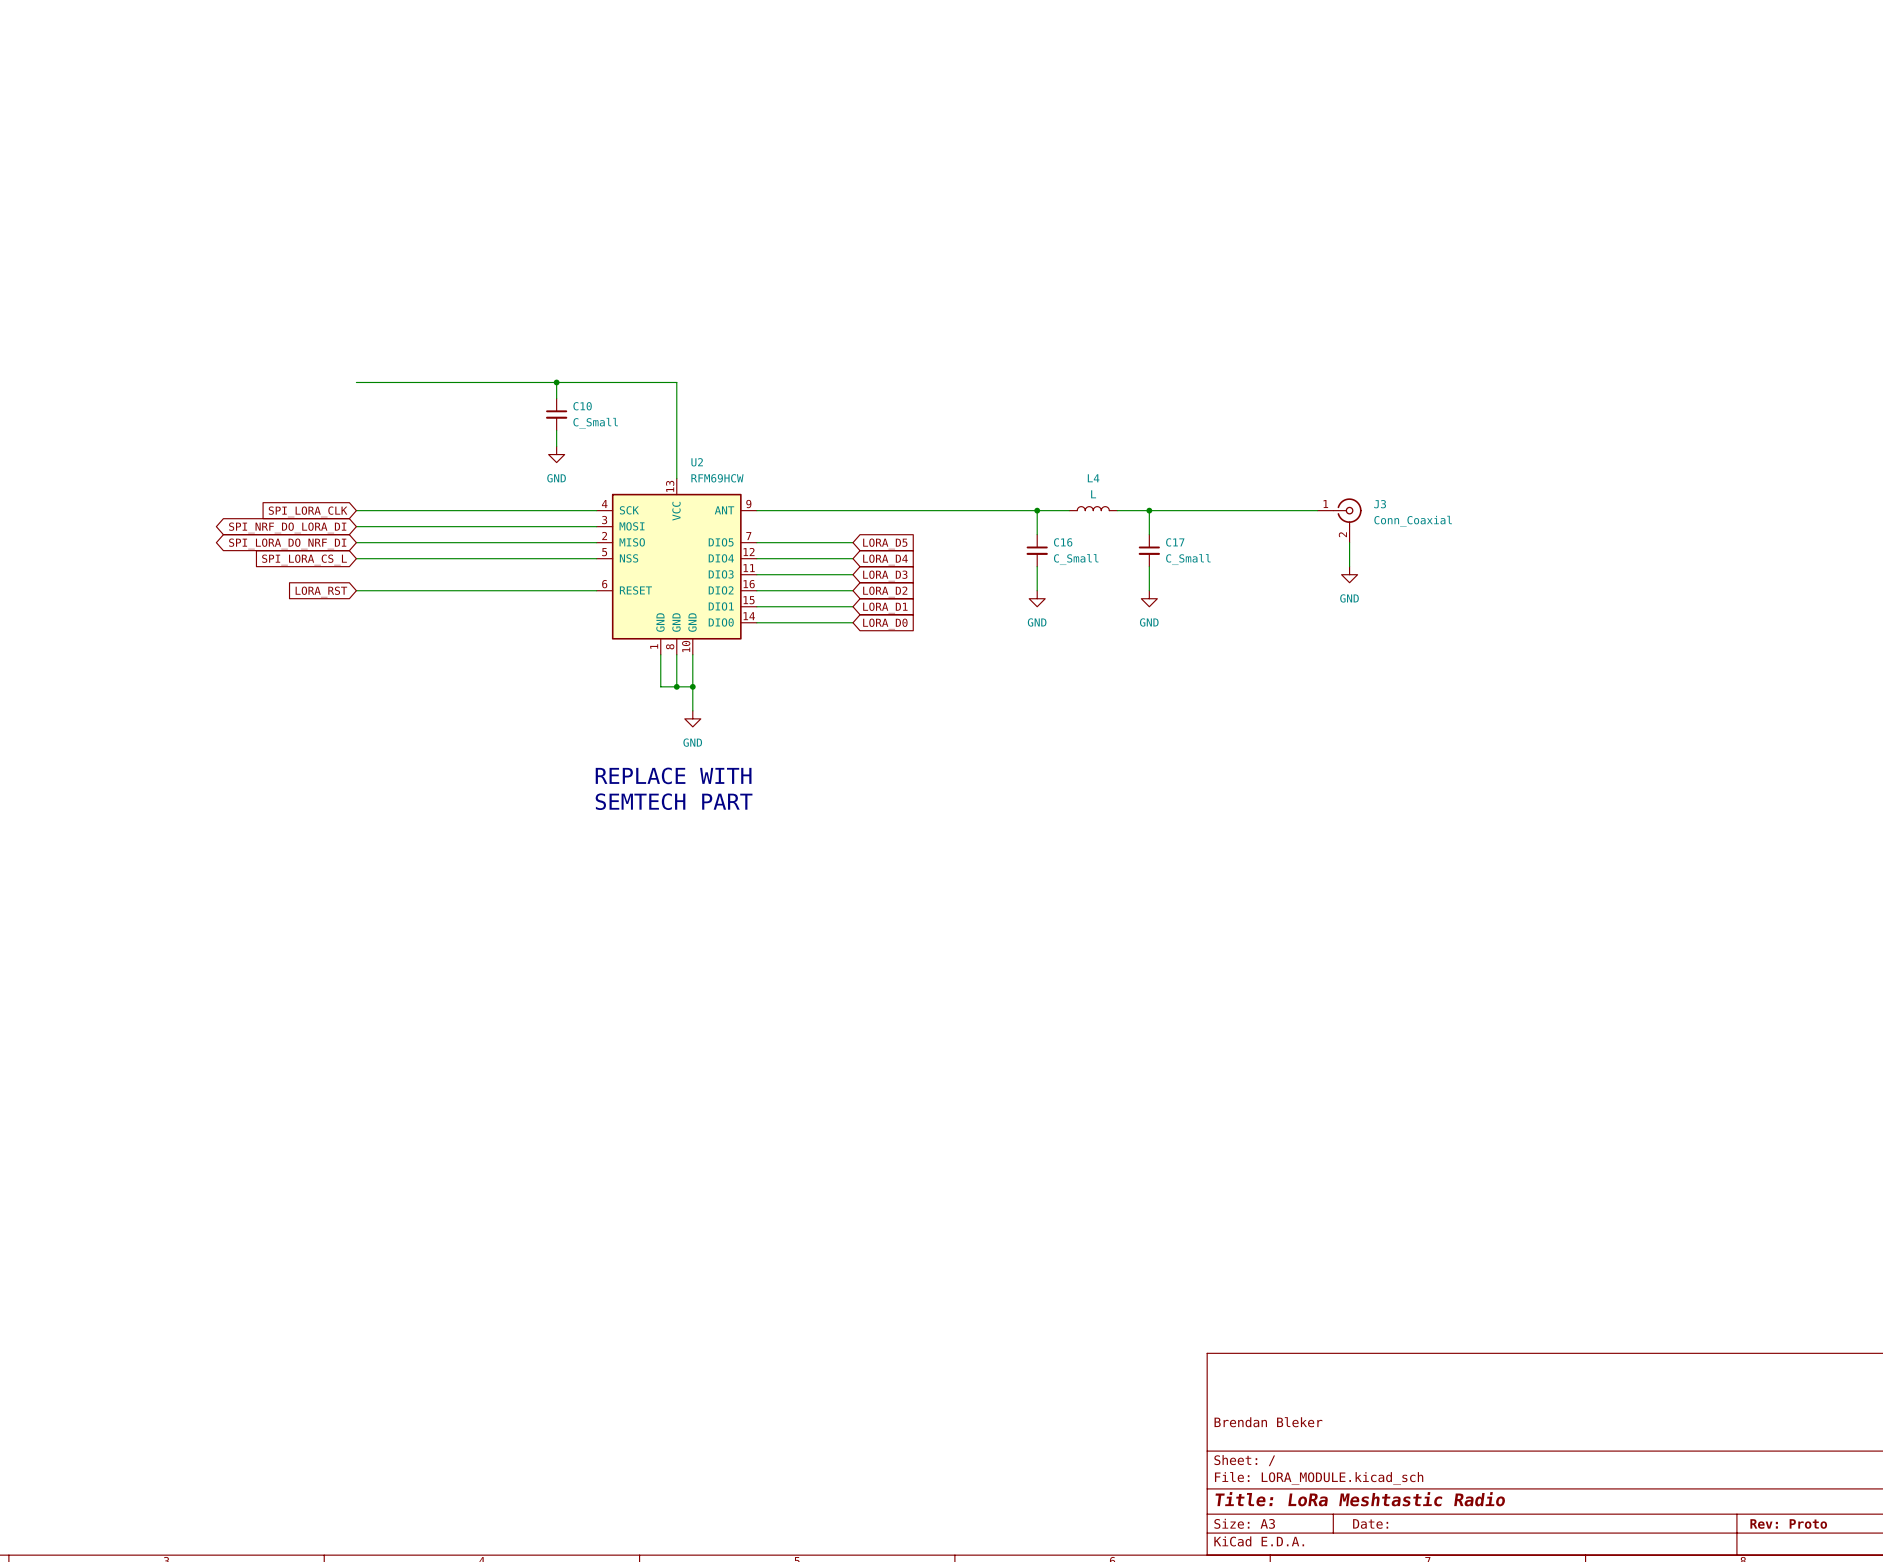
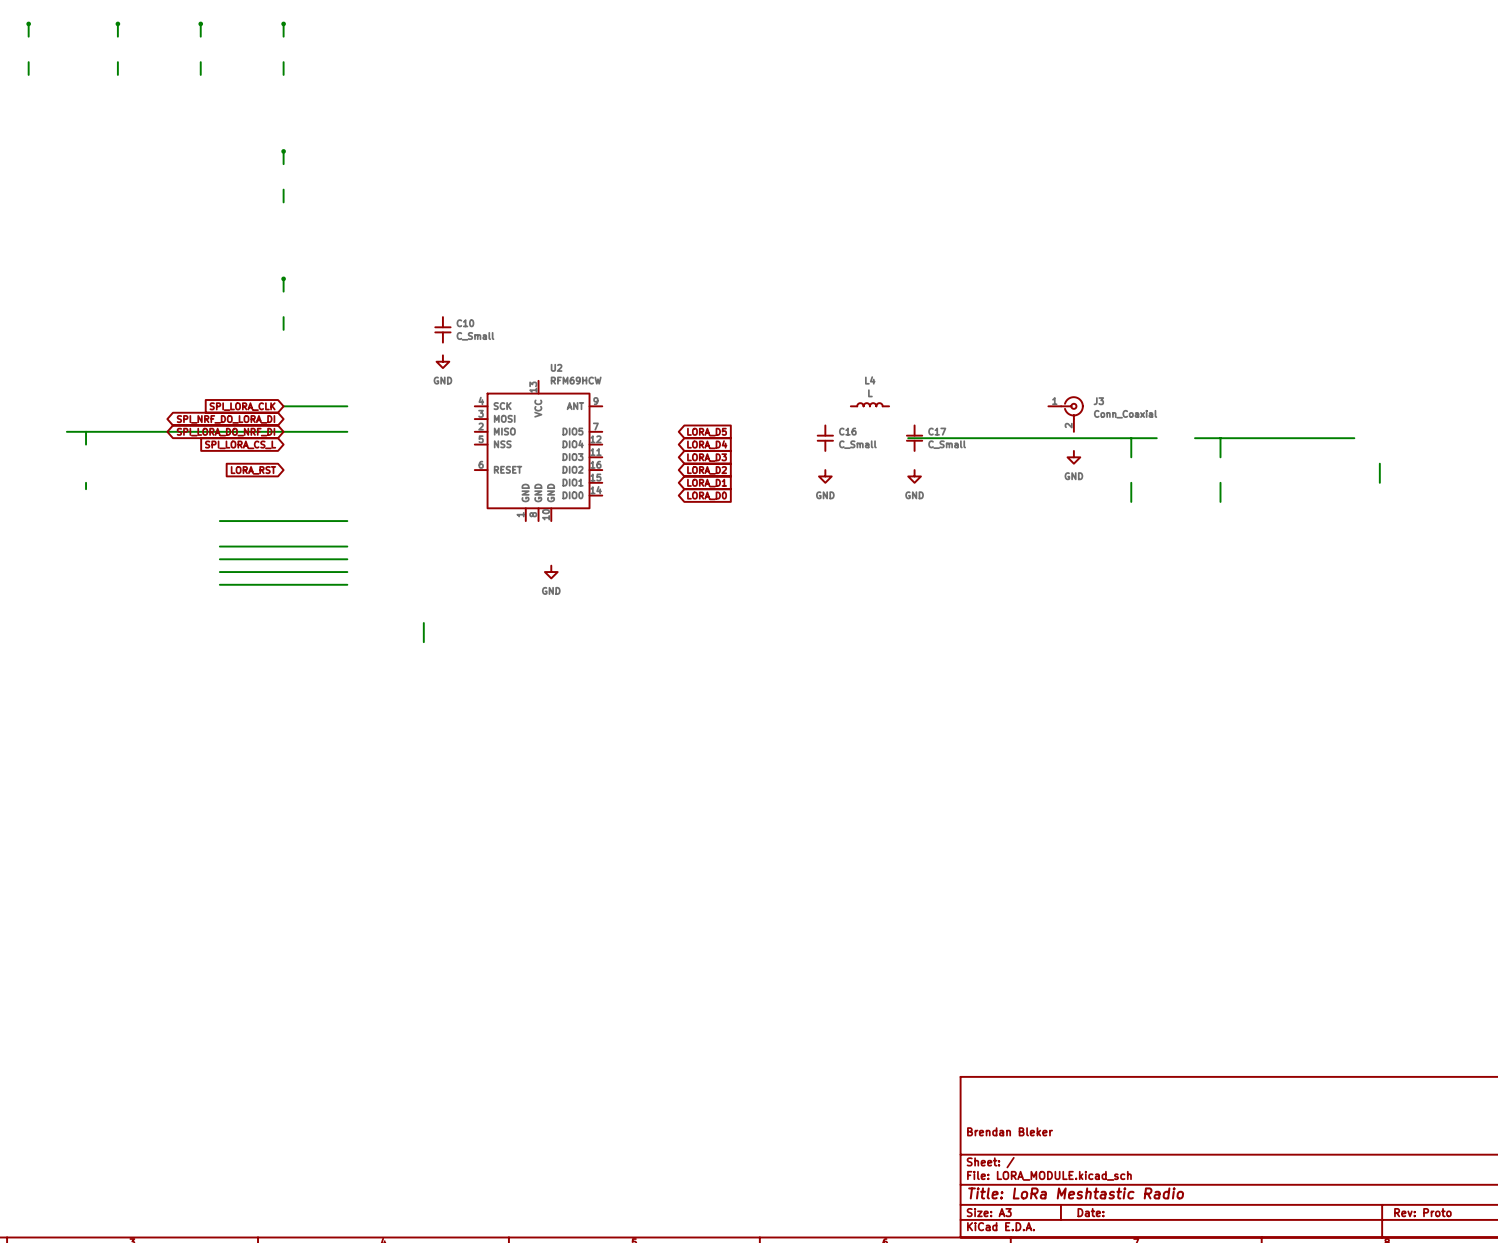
wire: none -> (28, 23) (28, 36)
junction: none -> (28, 23)
wire: none -> (117, 23) (117, 36)
junction: none -> (117, 23)
wire: none -> (200, 23) (200, 36)
junction: none -> (200, 23)
wire: none -> (283, 23) (283, 36)
junction: none -> (283, 23)
wire: none -> (28, 62) (28, 74)
wire: none -> (117, 62) (117, 74)
wire: none -> (200, 62) (200, 74)
wire: none -> (283, 62) (283, 74)
wire: none -> (283, 151) (283, 164)
junction: none -> (283, 151)
wire: none -> (283, 189) (283, 202)
wire: none -> (283, 278) (283, 291)
junction: none -> (283, 278)
wire: (356, 382) (676, 382) (676, 478) -> none
wire: (556, 382) (556, 398) -> none
junction: (556, 382) -> none
wire: none -> (283, 317) (283, 329)
wire: (556, 430) (556, 446) -> none
wire: (436, 510) (596, 510) -> none
wire: (756, 510) (1069, 510) -> none
wire: (1037, 510) (1037, 534) -> none
junction: (1037, 510) -> none
wire: (1117, 510) (1317, 510) -> none
wire: (1149, 510) (1149, 534) -> none
junction: (1149, 510) -> none
wire: (356, 526) (596, 526) -> none
wire: none -> (66, 431) (283, 431)
wire: none -> (86, 431) (86, 444)
wire: (436, 542) (596, 542) -> none
wire: (756, 542) (852, 542) -> none
wire: (1349, 542) (1349, 566) -> (1131, 438) (1131, 457)
wire: none -> (908, 438) (1156, 438)
wire: none -> (1195, 438) (1354, 438)
wire: none -> (1220, 438) (1220, 457)
wire: (356, 558) (596, 558) -> none
wire: (756, 558) (852, 558) -> none
wire: (1037, 566) (1037, 590) -> none
wire: (1149, 566) (1149, 590) -> none
wire: (756, 574) (852, 574) -> none
wire: none -> (1379, 463) (1379, 482)
wire: (356, 590) (596, 590) -> none
wire: (756, 590) (852, 590) -> none
wire: none -> (86, 482) (86, 489)
wire: (756, 606) (852, 606) -> none
wire: none -> (1131, 482) (1131, 501)
wire: none -> (1220, 482) (1220, 501)
wire: (756, 622) (852, 622) -> none
wire: none -> (219, 521) (347, 521)
wire: (660, 654) (660, 686) (692, 686) -> none
wire: (676, 654) (676, 686) -> none
wire: (692, 654) (692, 710) -> none
wire: none -> (219, 546) (347, 546)
junction: (676, 686) -> none
junction: (692, 686) -> none
wire: none -> (219, 559) (347, 559)
wire: none -> (219, 572) (347, 572)
wire: none -> (219, 584) (347, 584)
text: REPLACE WITH (673, 775) -> none
wire: none -> (423, 623) (423, 642)
text: SEMTECH PART (674, 801) -> none

